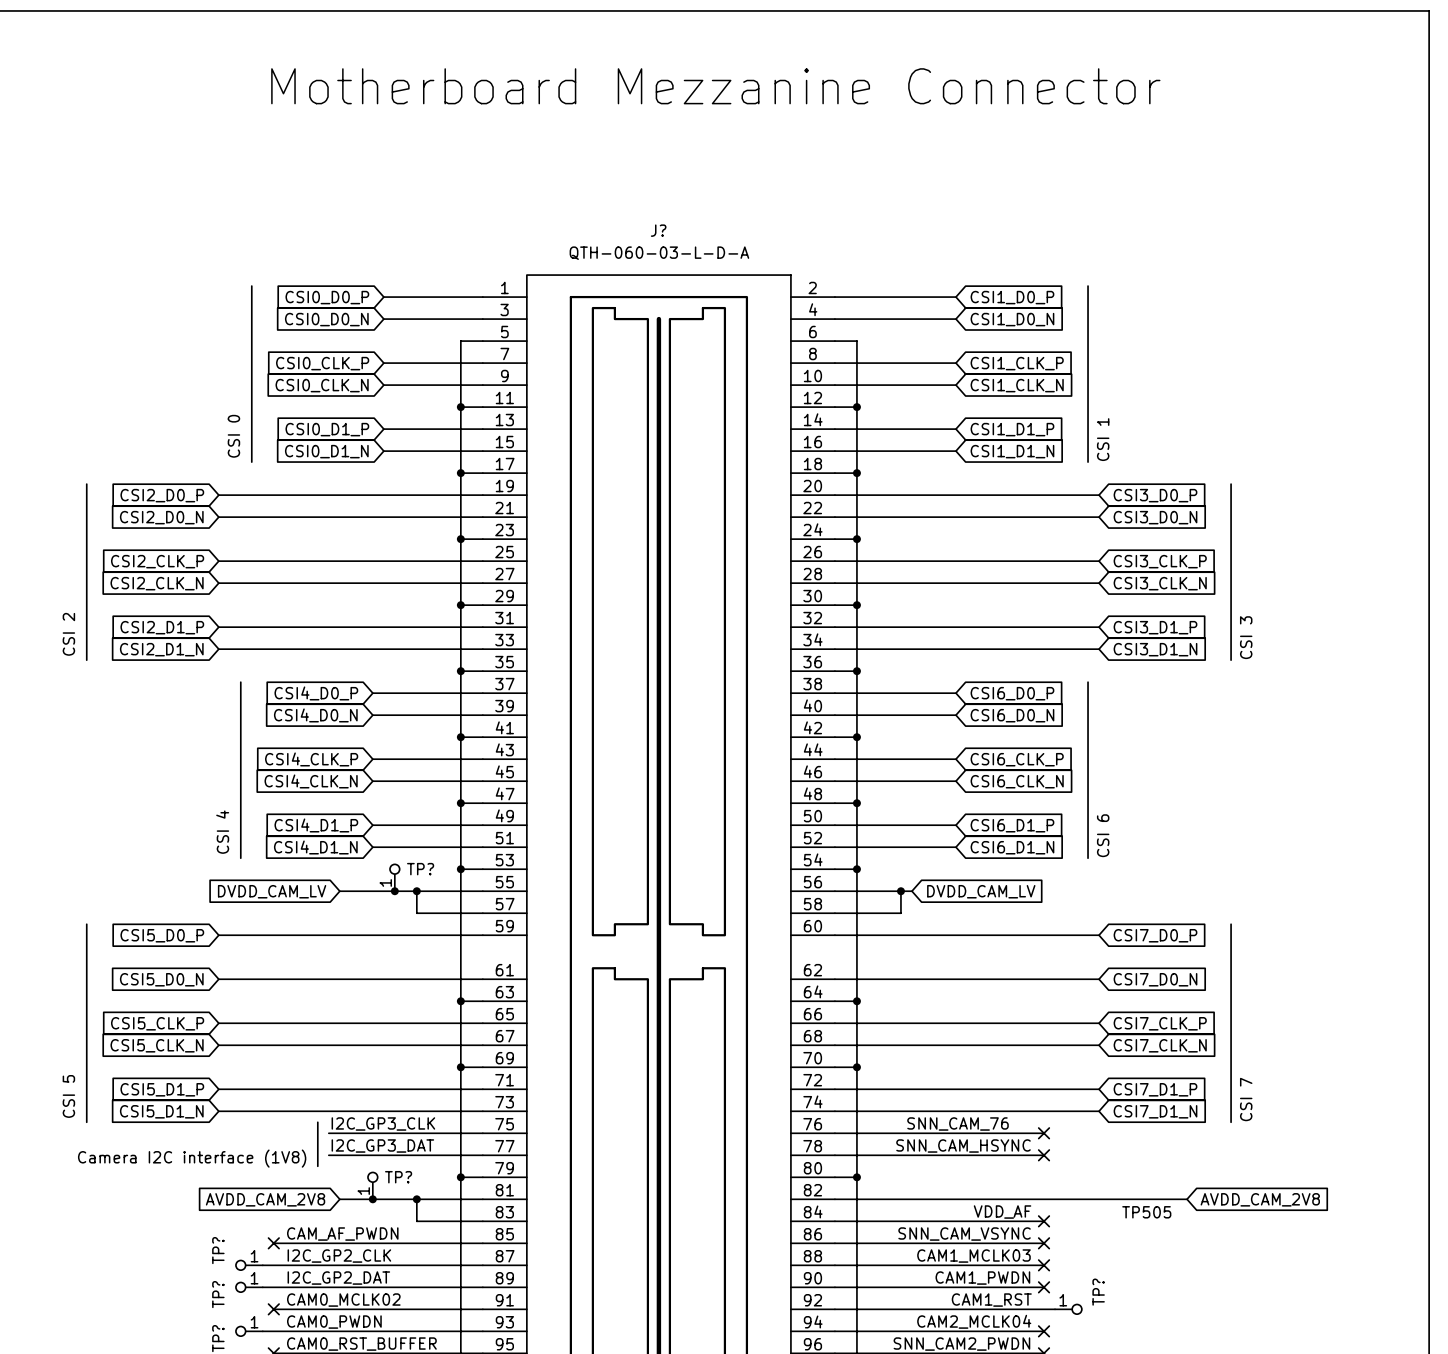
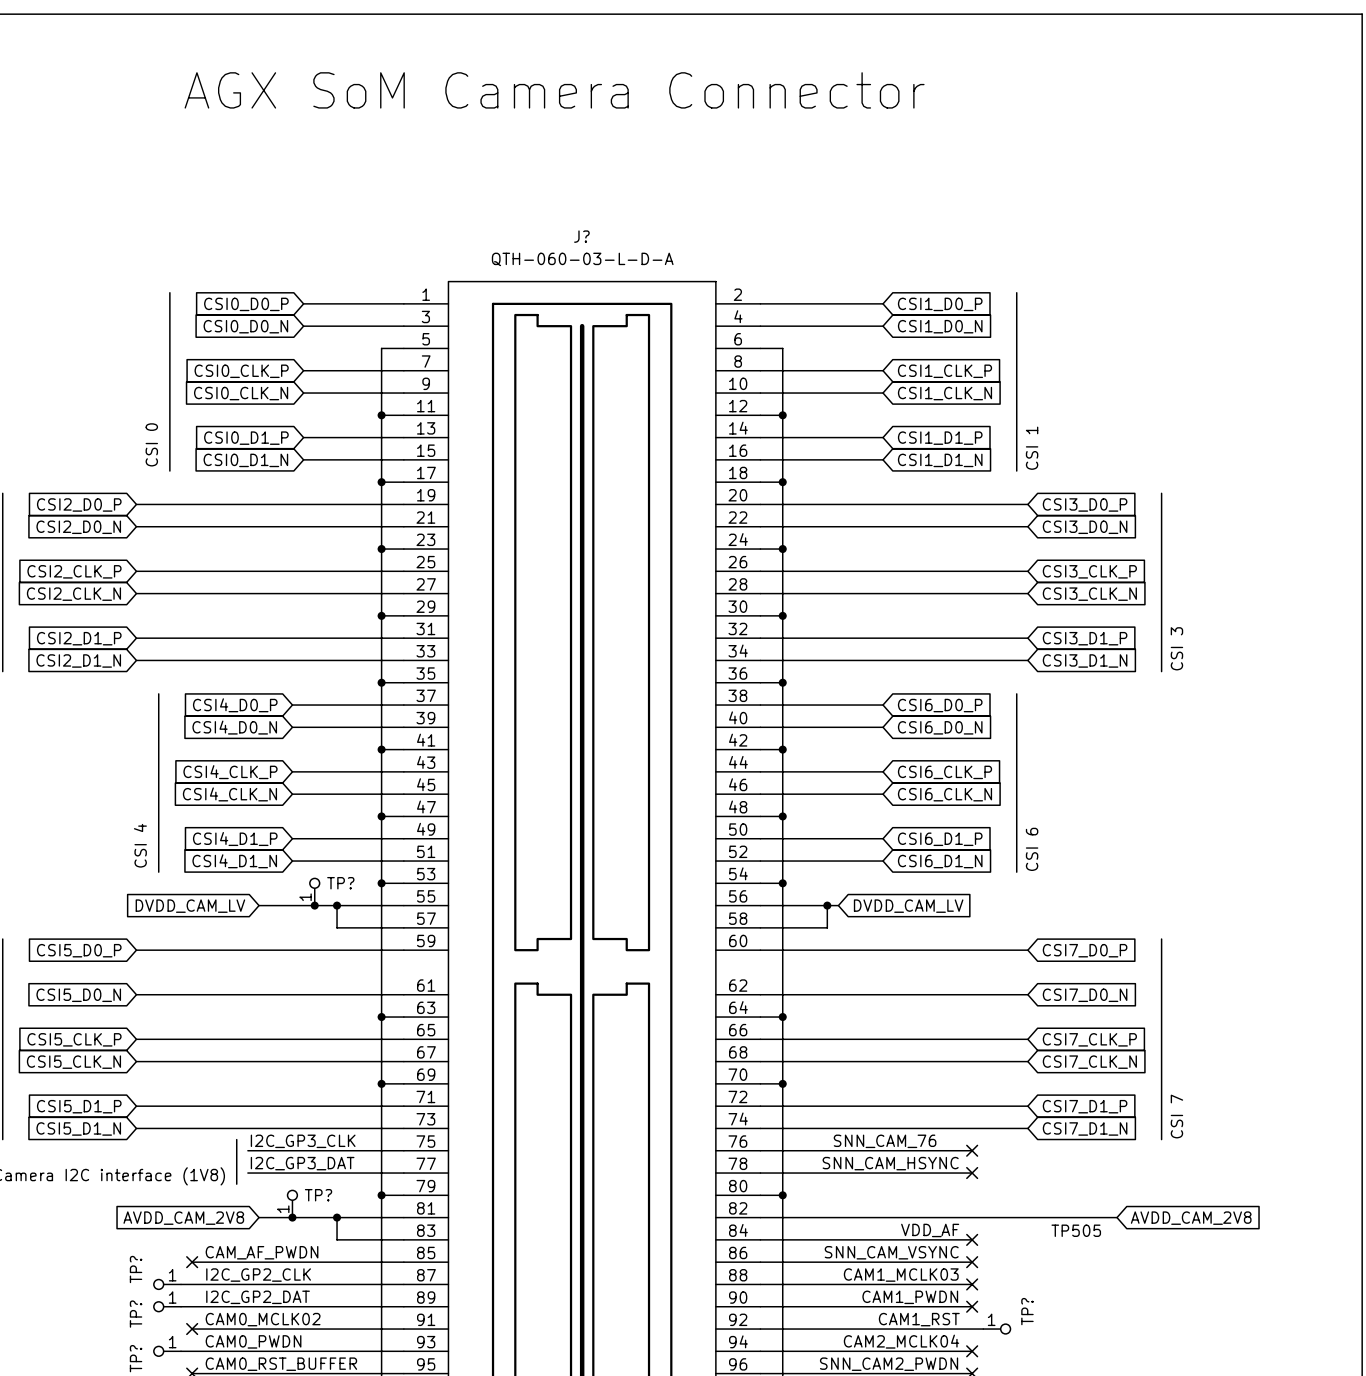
text: Motherboard Mezzanine Connector (715, 86) -> AGX SoM Camera Connector (554, 90)

